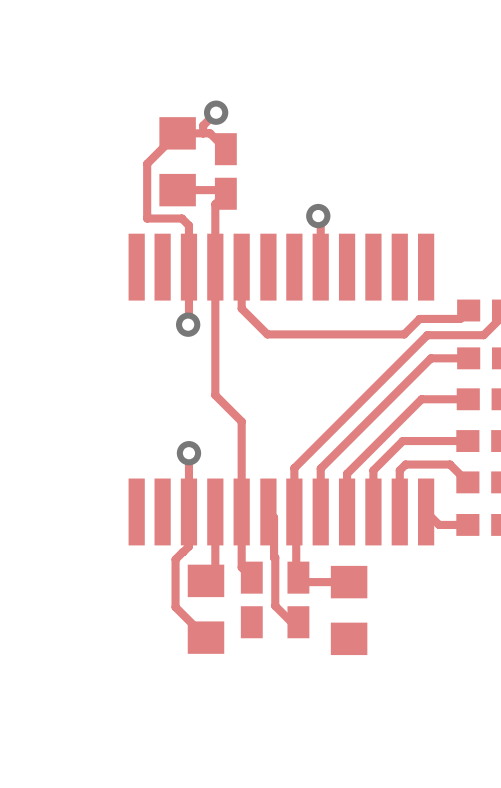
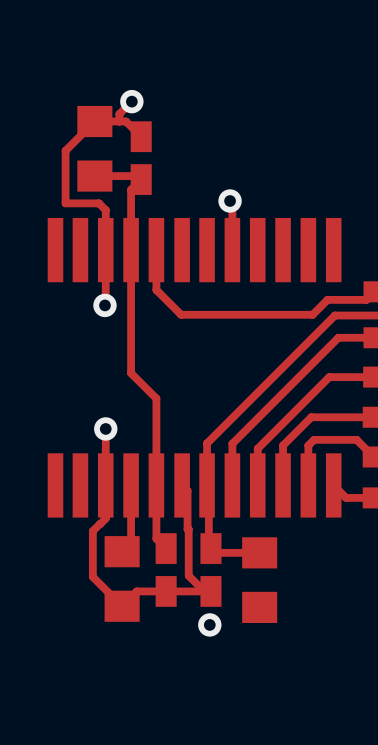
top track: none -> (204, 591) (136, 591) (122, 606)
via: none -> (209, 624)

